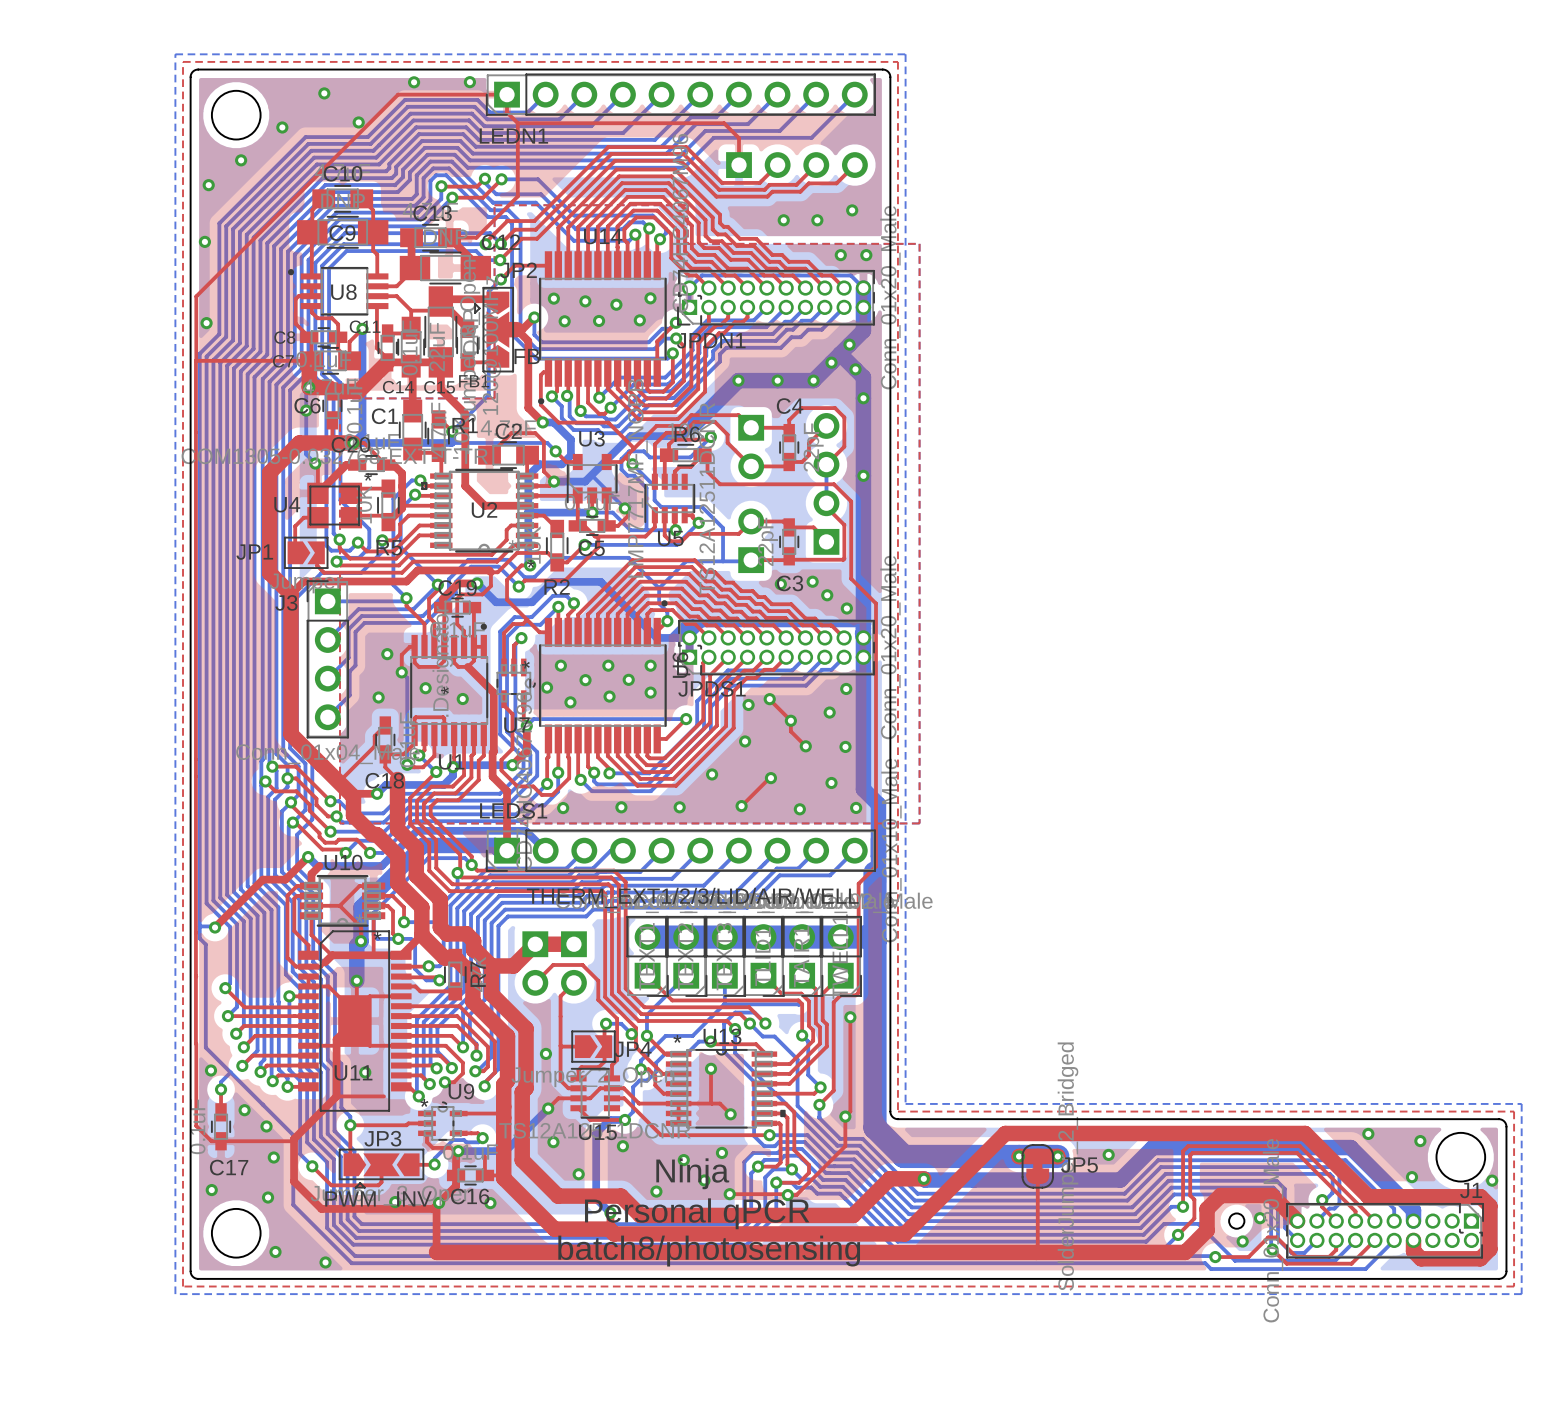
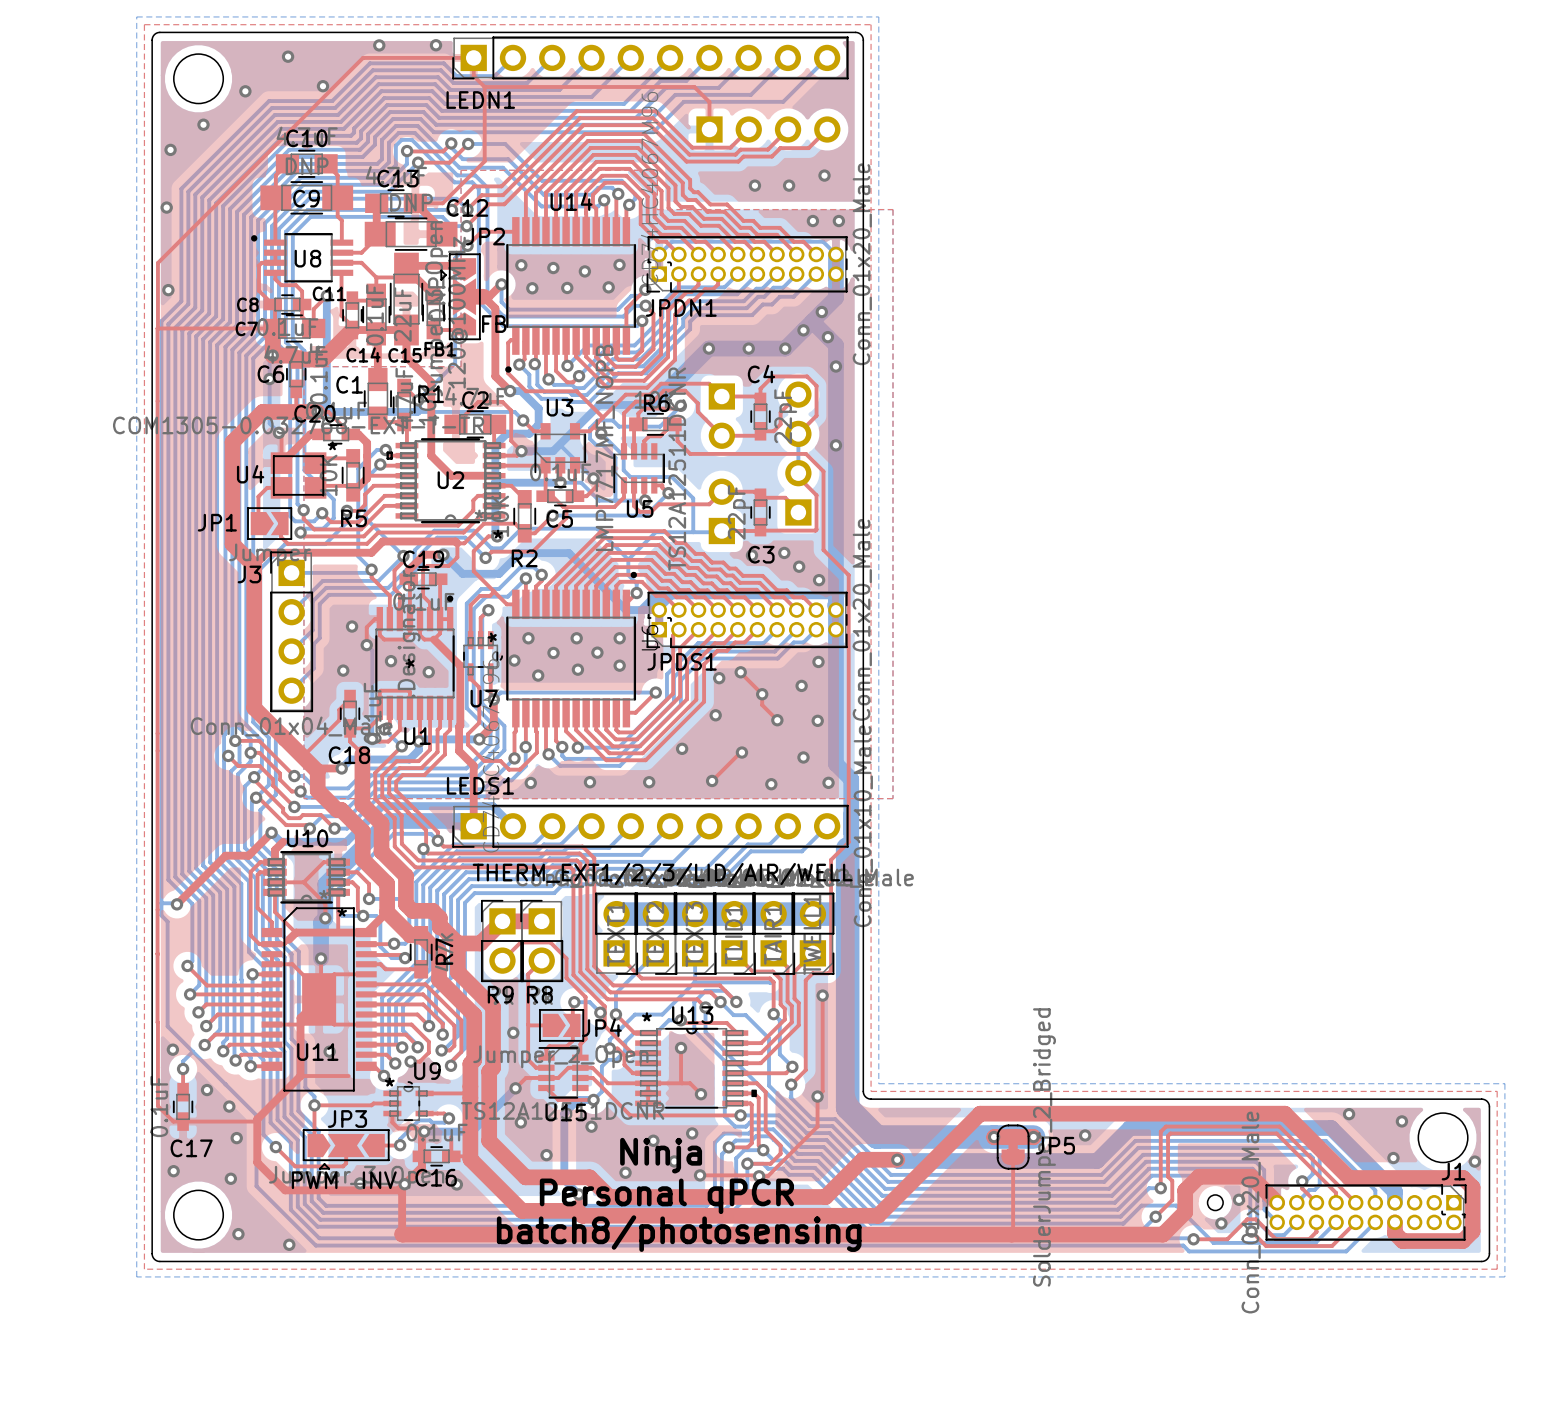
R9 side: bottom (535, 963) -> top (502, 940)
R8 side: bottom (573, 963) -> top (541, 940)

